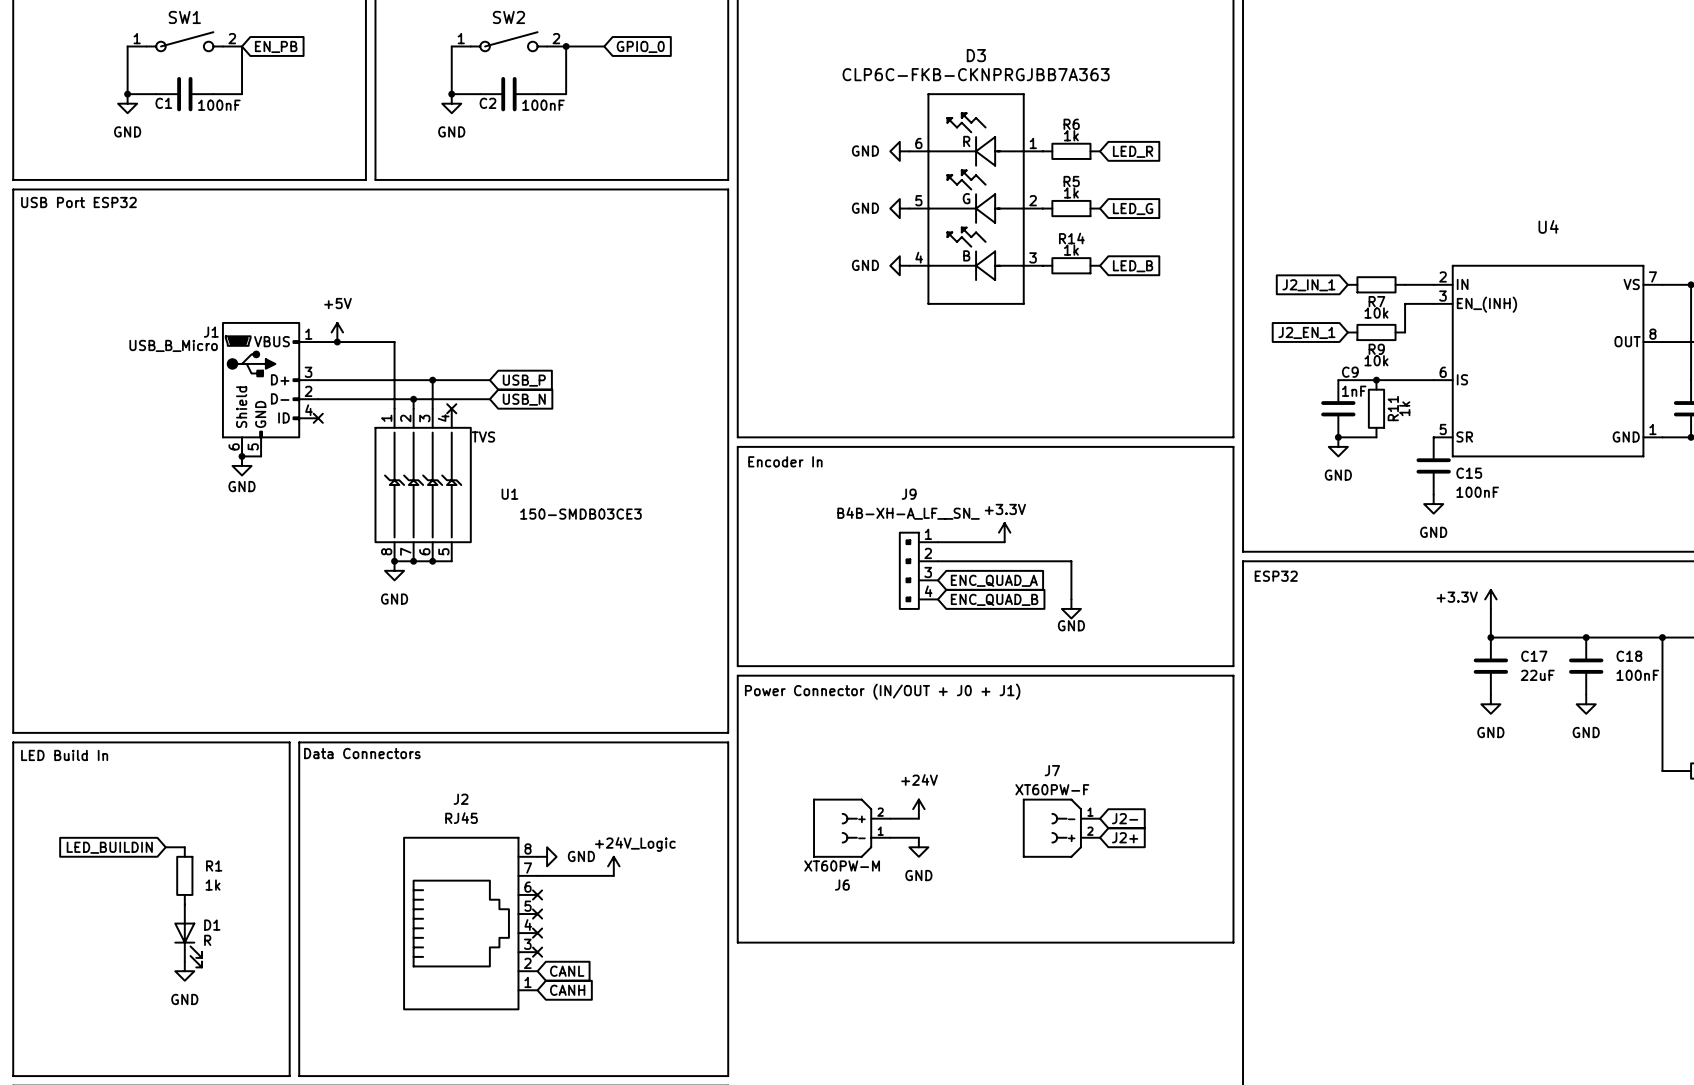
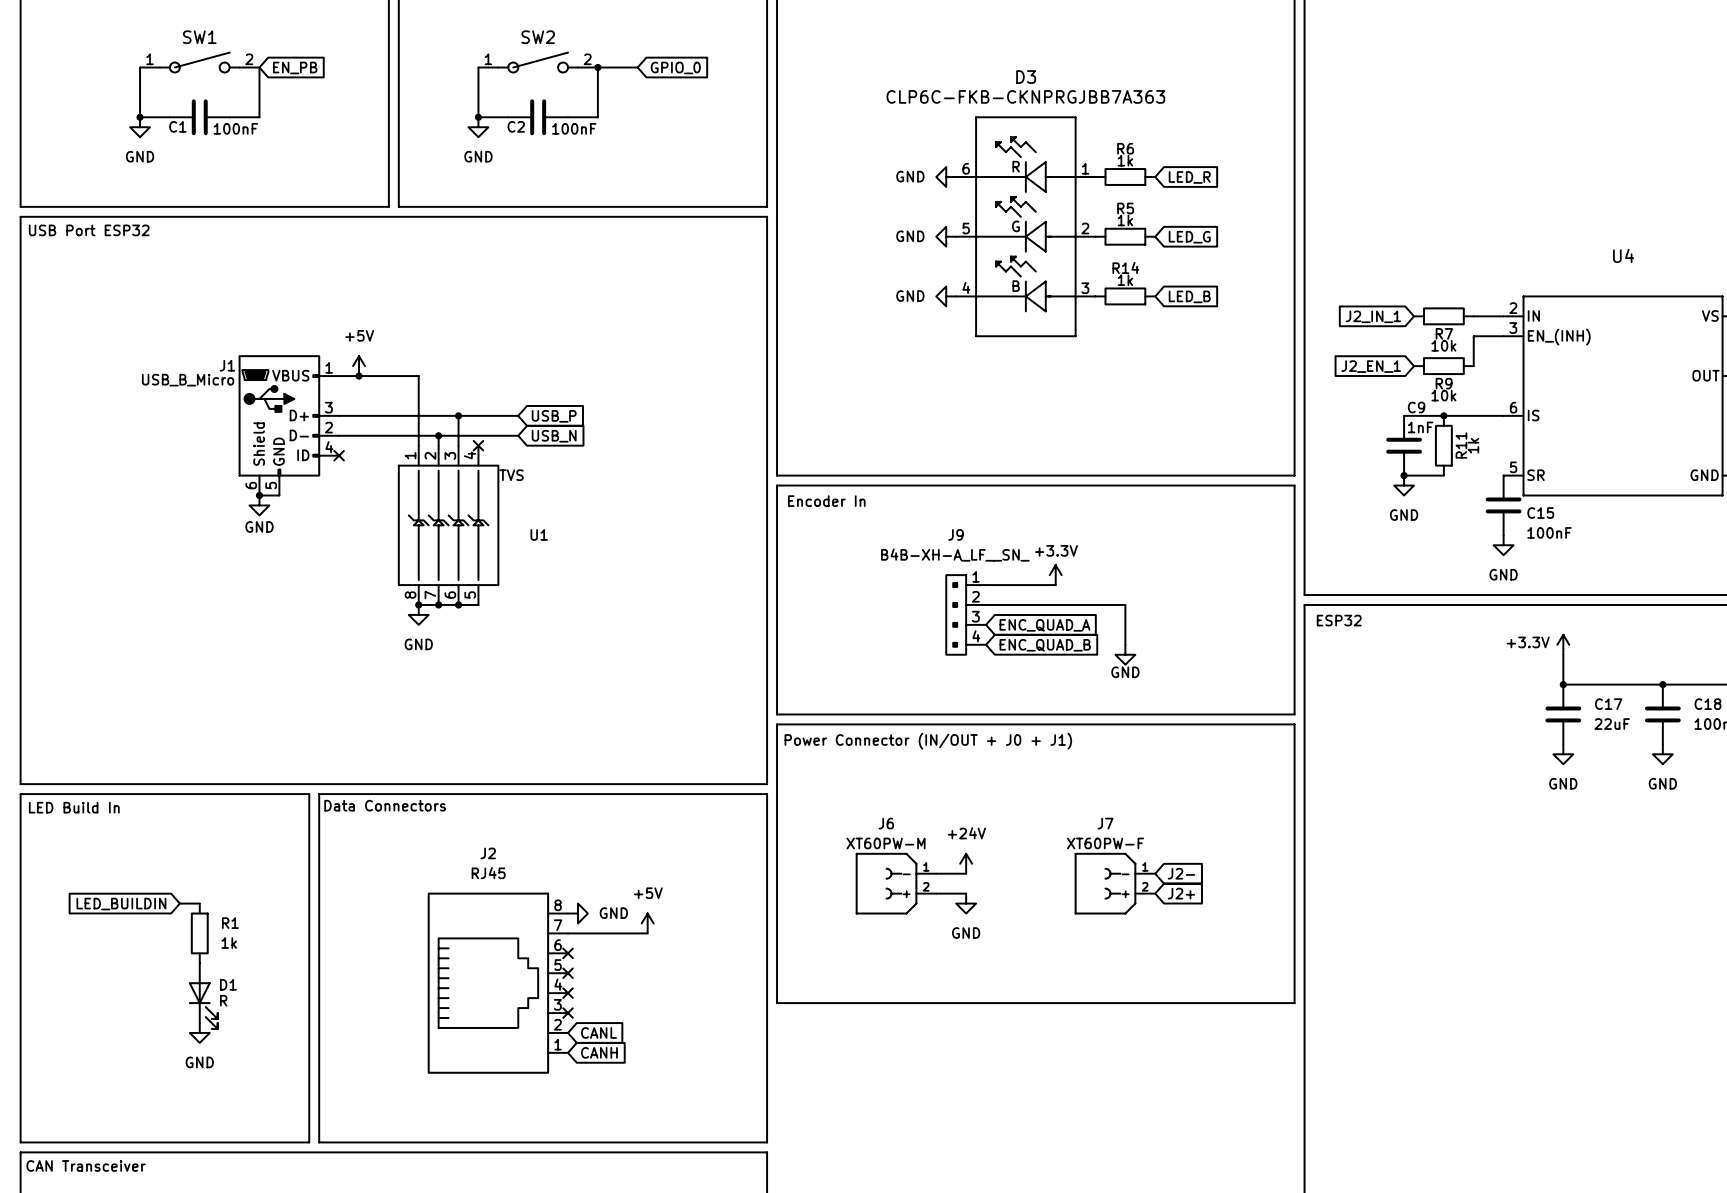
U1 value: 150-SMDB03CE3 (580, 514) -> none
J6 flip: as is (842, 828) -> up-down (886, 883)
power symbol: +24V_Logic (613, 866) -> +5V (647, 923)

